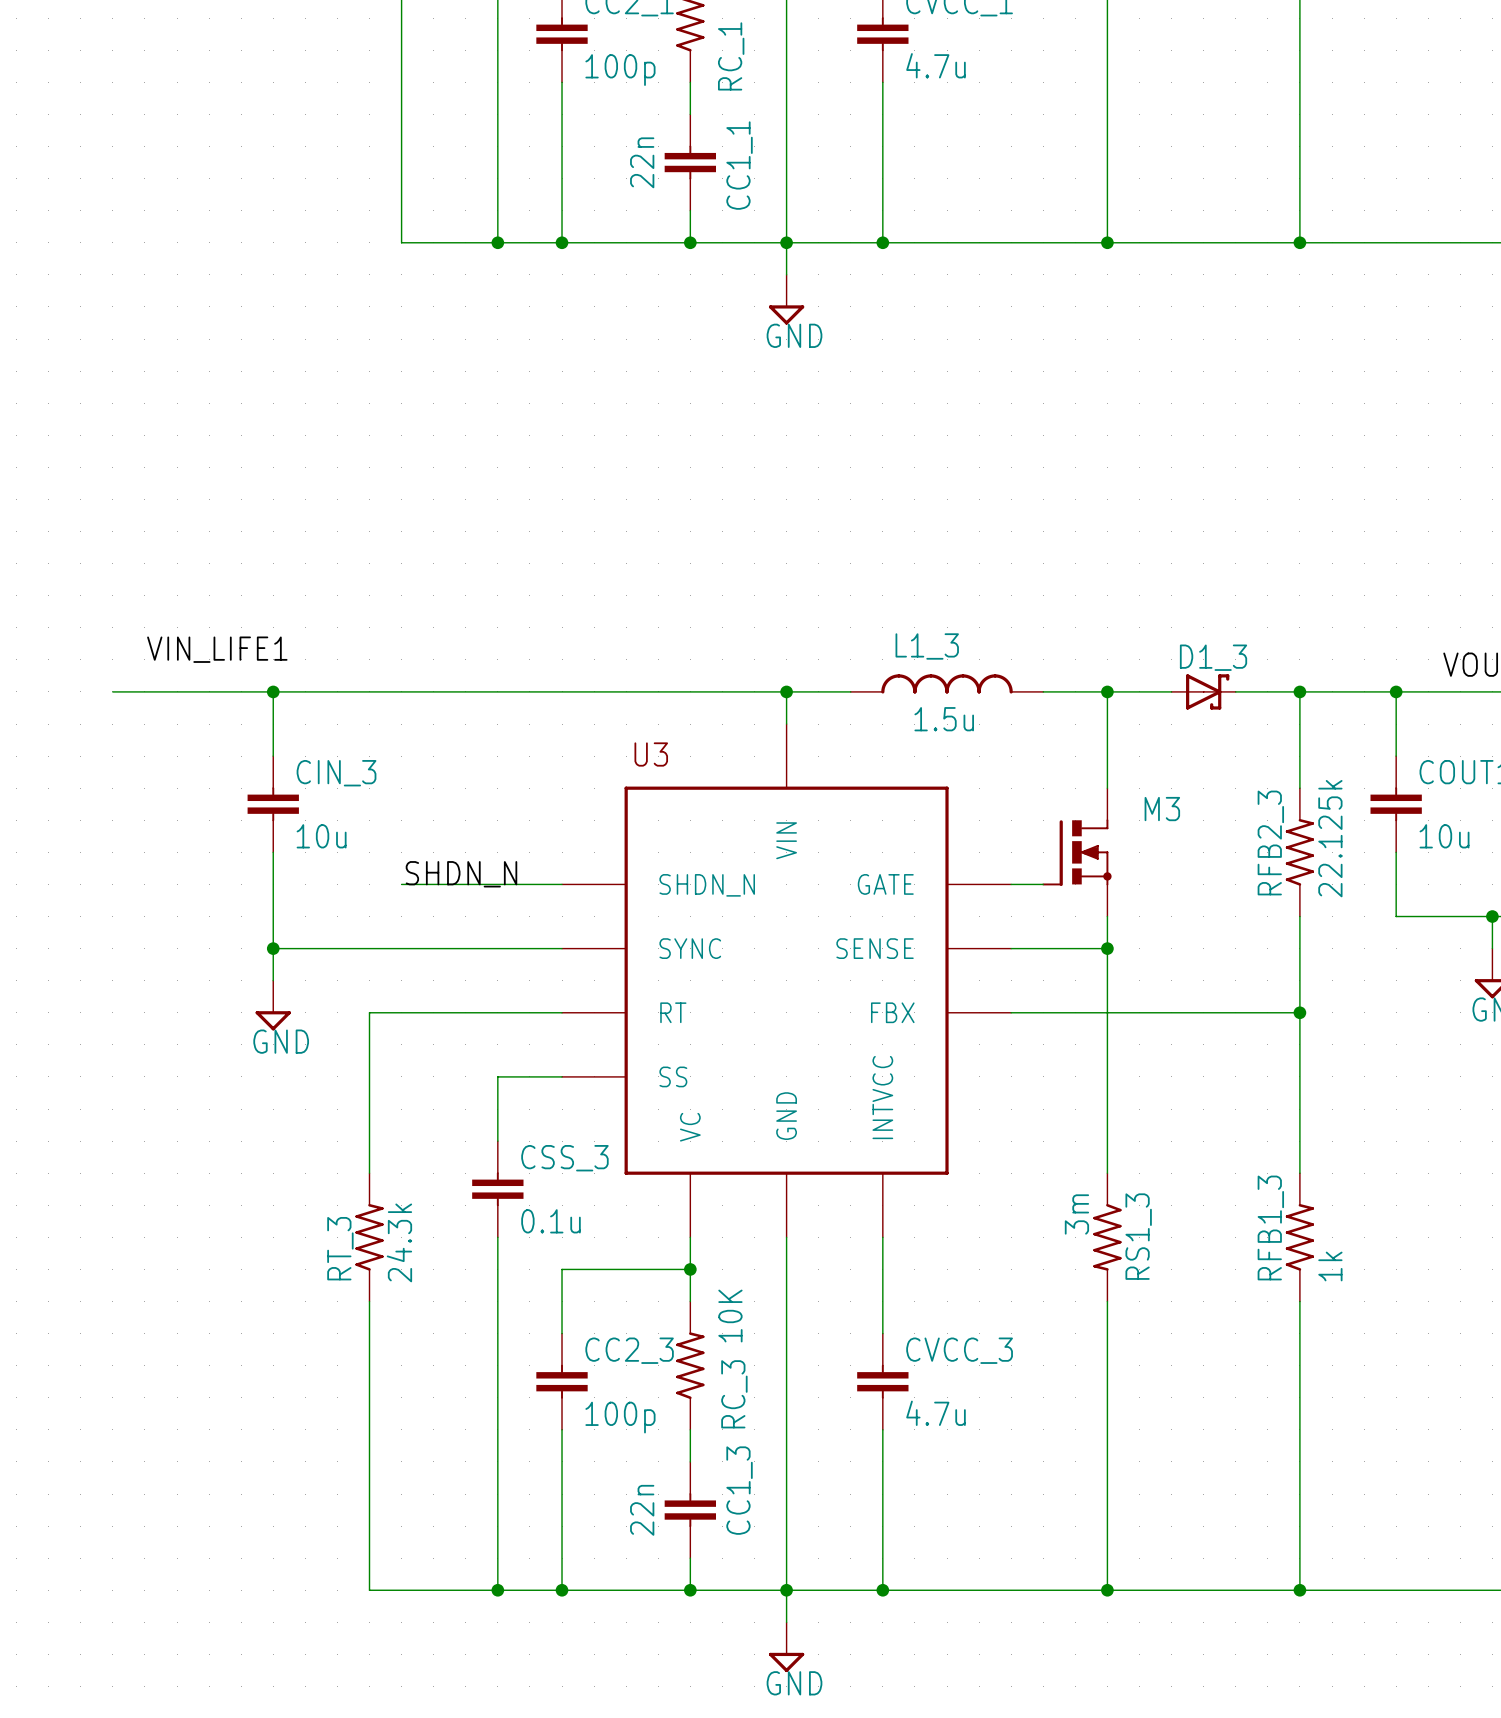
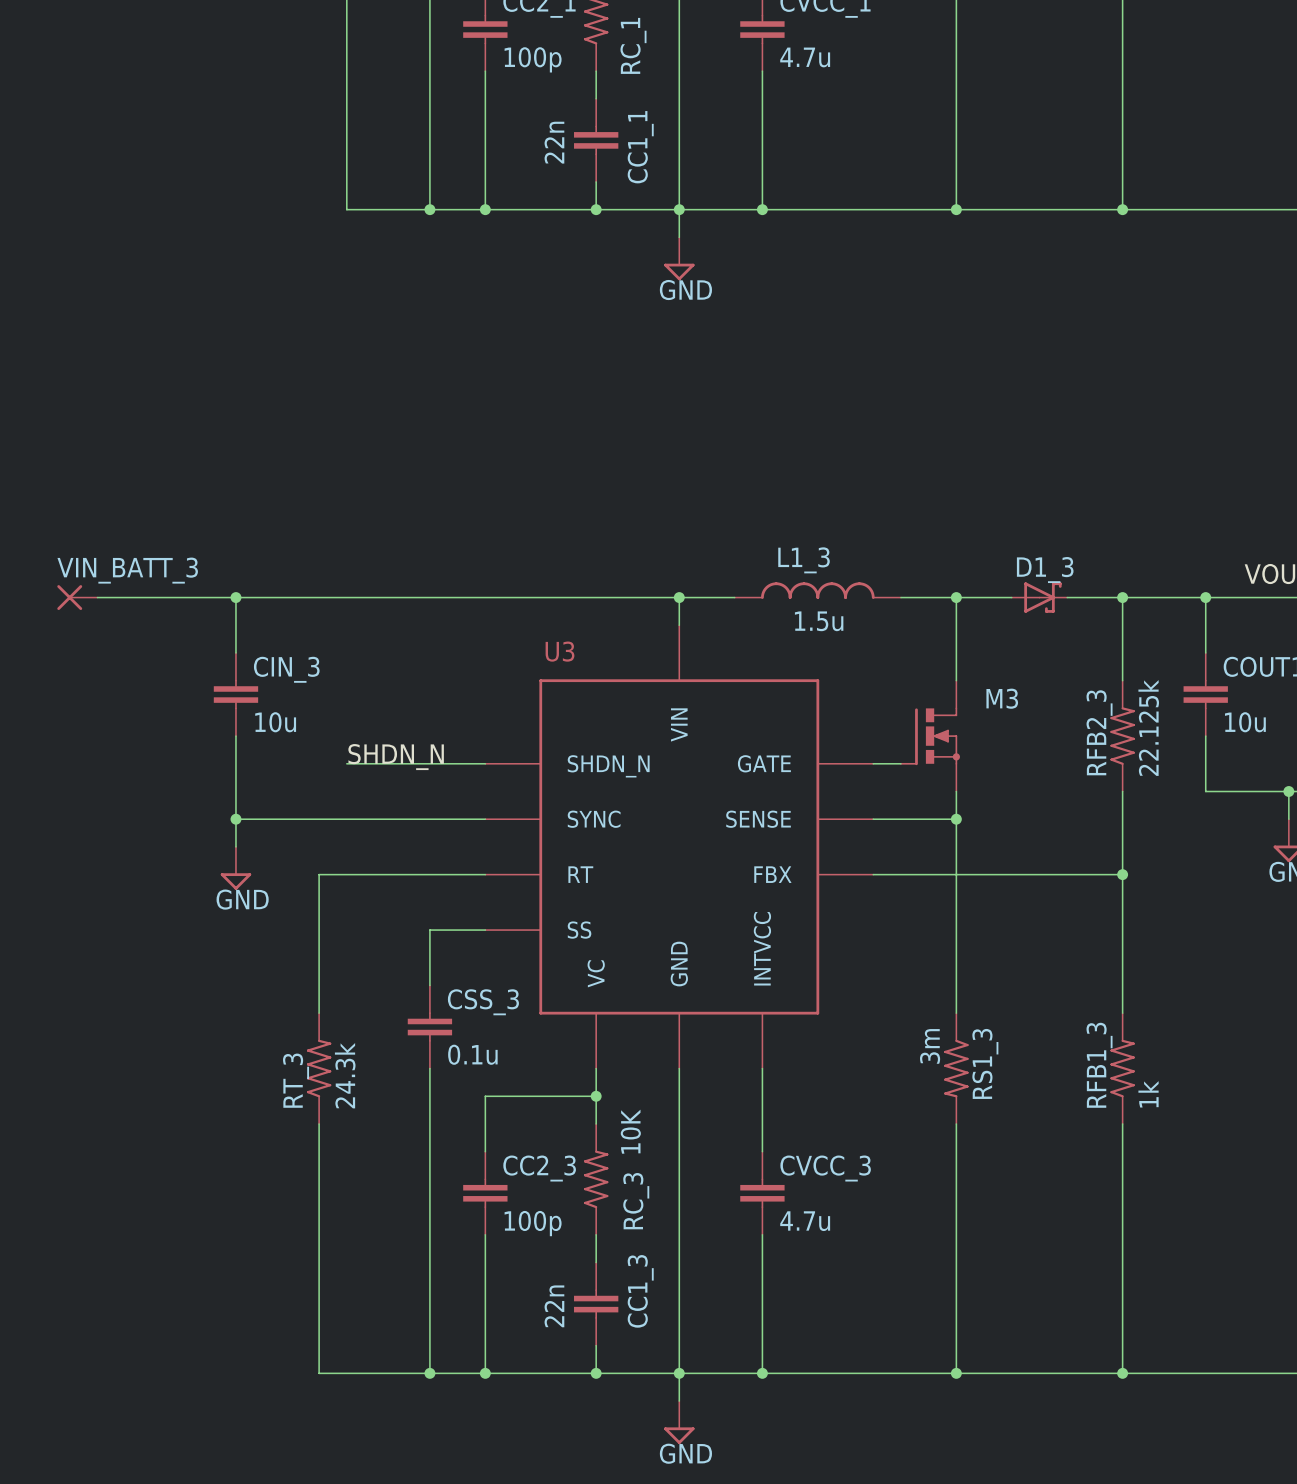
label: VIN_LIFE1 (217, 649) -> none
VIN_BATT_3: none -> (77, 597)

